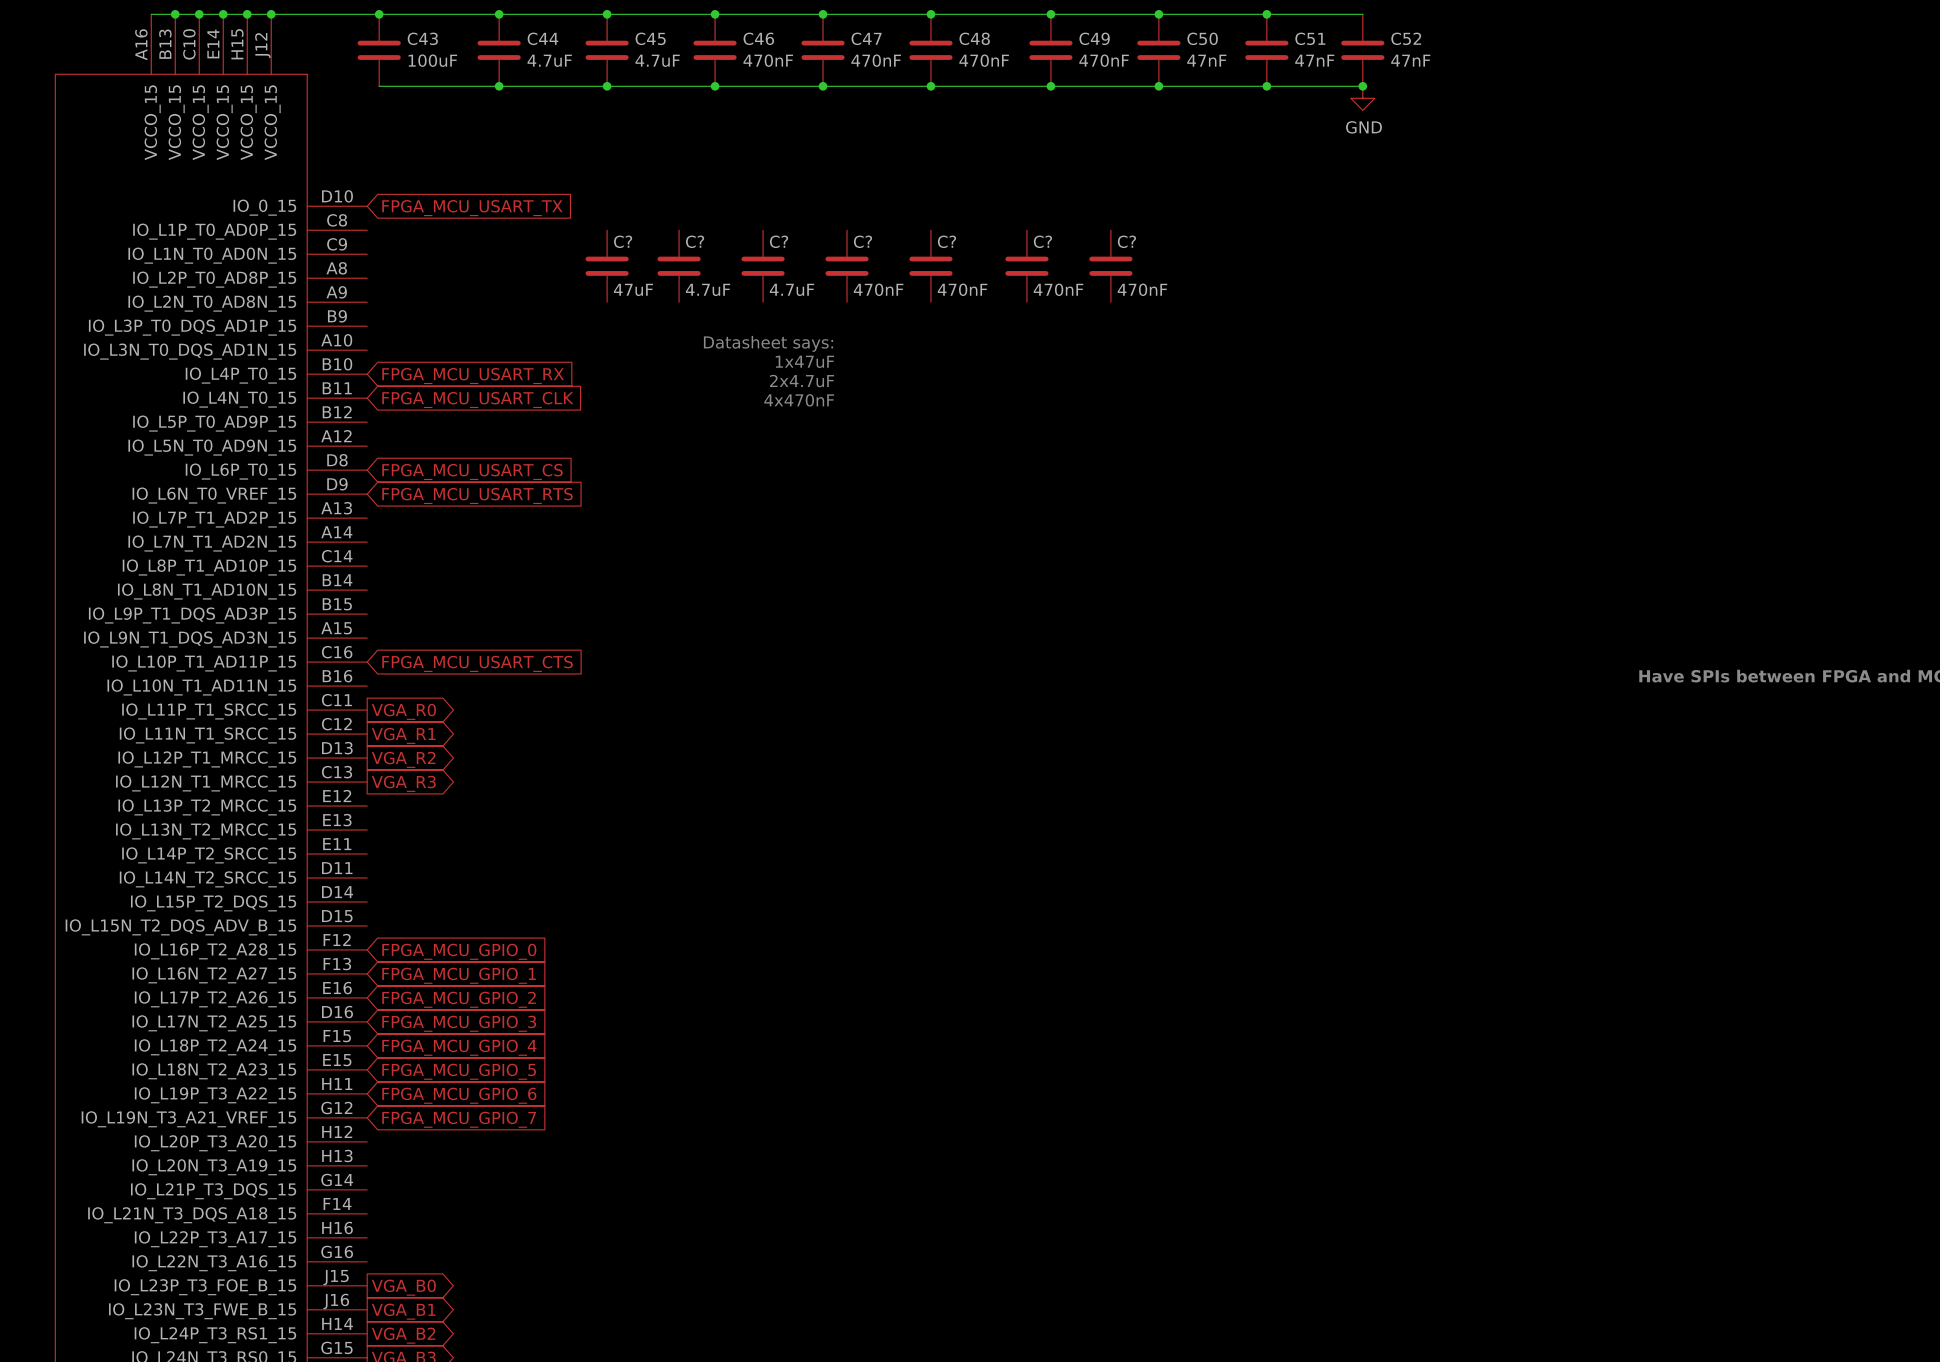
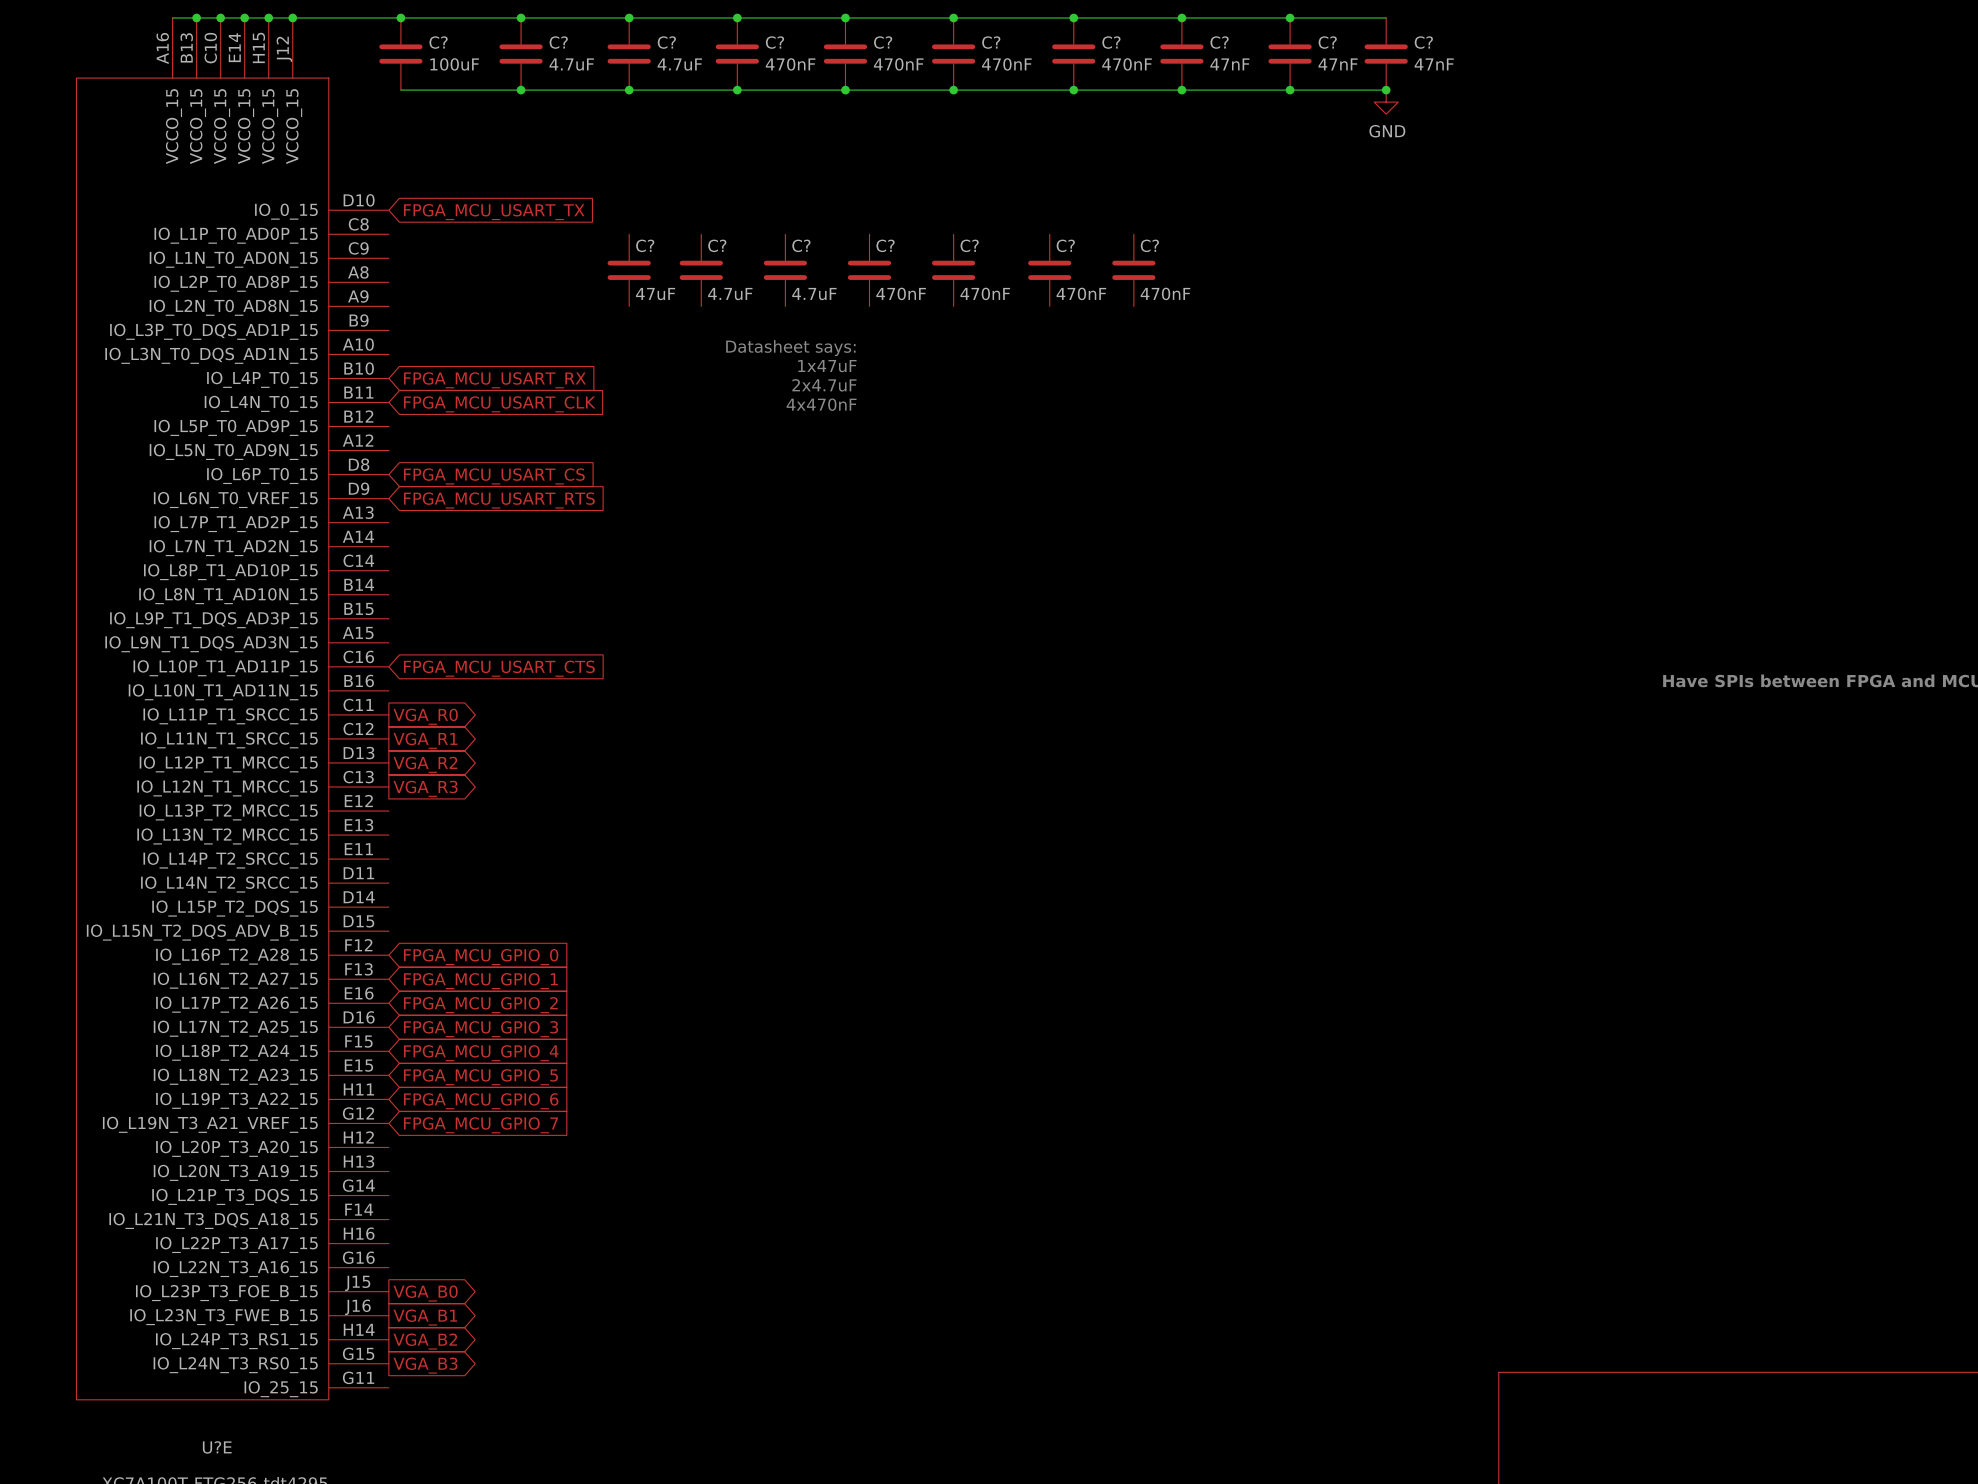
C43 name: C43 (422, 38) -> C? (438, 42)
C44 name: C44 (542, 38) -> C? (558, 42)
C45 name: C45 (650, 38) -> C? (666, 42)
C46 name: C46 (758, 38) -> C? (774, 42)
C47 name: C47 (866, 38) -> C? (883, 42)
C48 name: C48 (974, 38) -> C? (991, 42)
C49 name: C49 (1094, 38) -> C? (1111, 42)
C50 name: C50 (1202, 38) -> C? (1219, 42)
C51 name: C51 (1310, 38) -> C? (1327, 42)
C52 name: C52 (1406, 38) -> C? (1423, 42)

